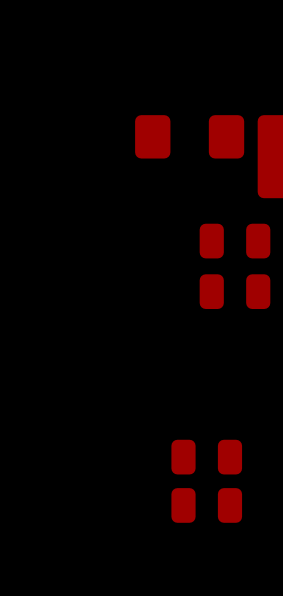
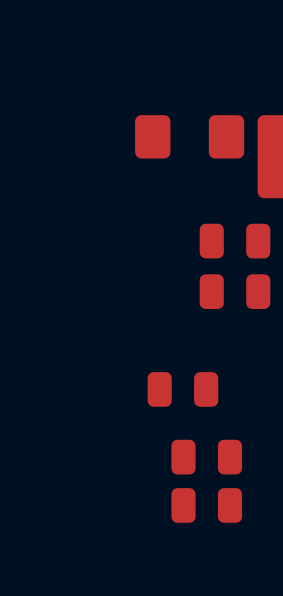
part: none -> (182, 389)

